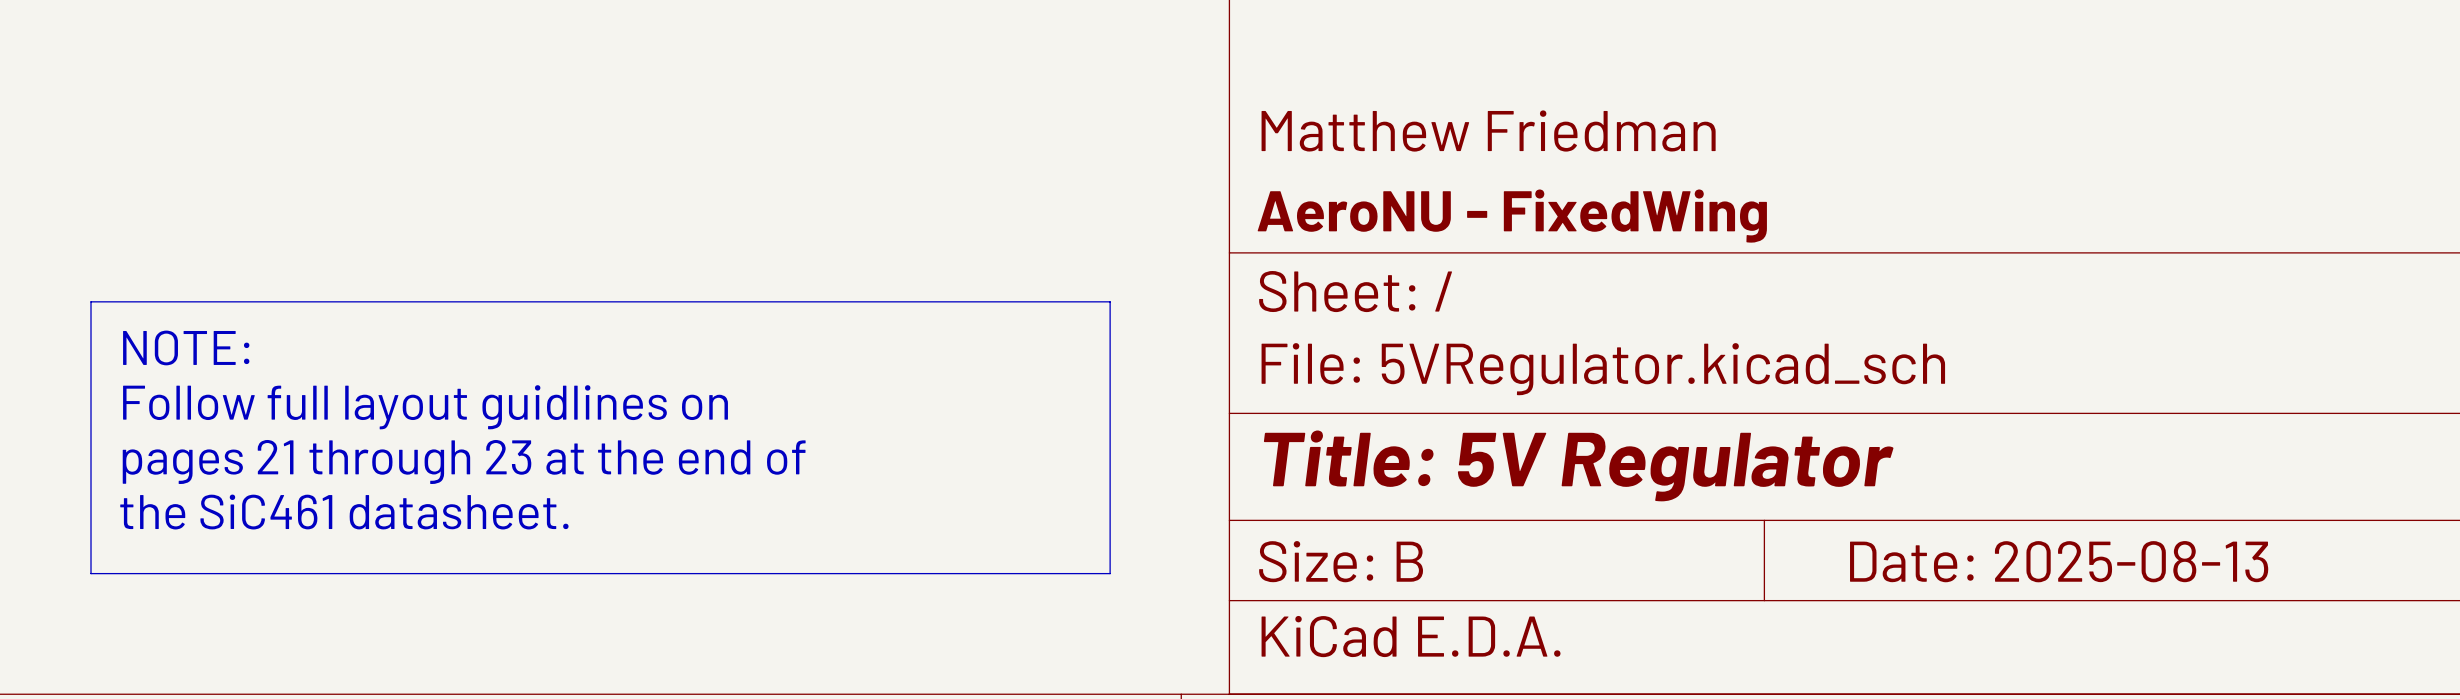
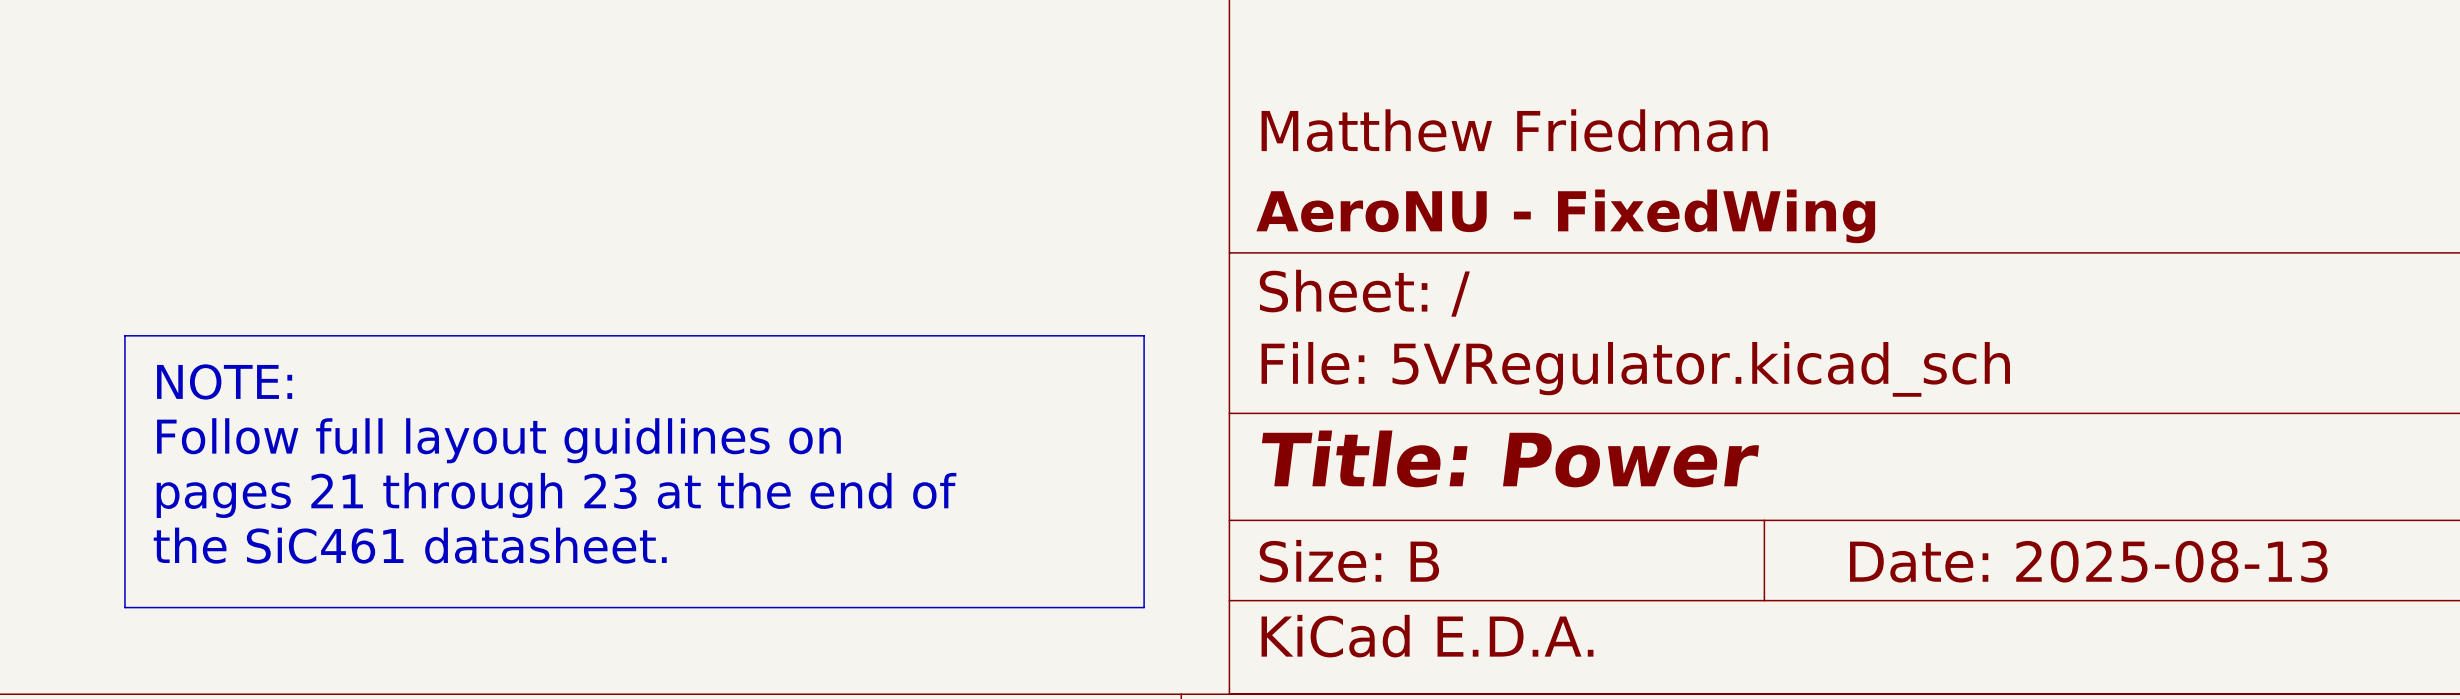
line: (91, 301) (1110, 301) (1110, 573) (91, 573) (91, 301) -> (124, 335) (1144, 335) (1144, 607) (124, 607) (124, 335)
text position: NOTE: (186, 347) -> NOTE: (224, 381)
text position: Follow full layout guidlines on (425, 407) -> Follow full layout guidlines on (498, 440)
text position: pages 21 through 23 at the end of (464, 461) -> pages 21 through 23 at the end of (556, 495)
title block: Title: 5V Regulator (1578, 465) -> Title: Power (1510, 458)
text position: the SiC461 datasheet. (344, 512) -> the SiC461 datasheet. (410, 545)

